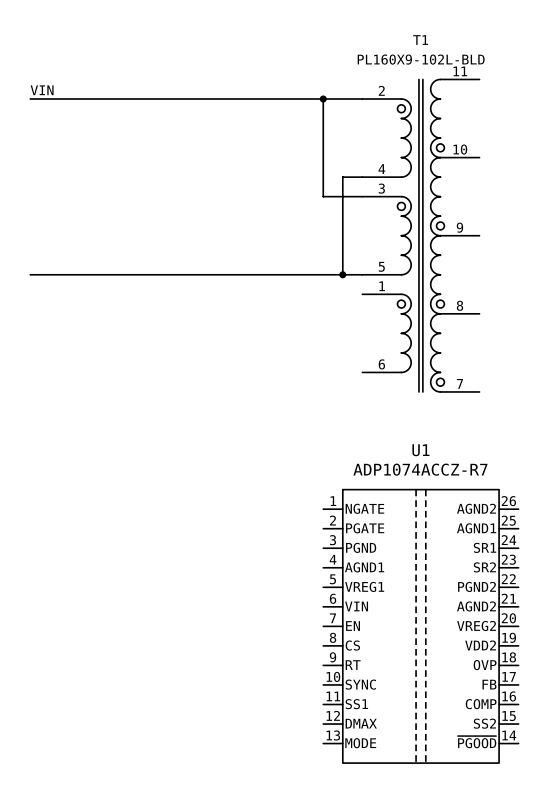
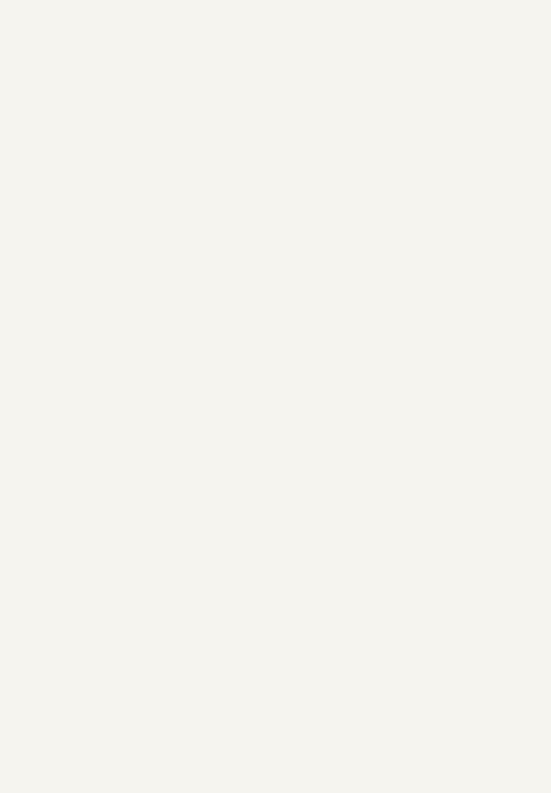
label: VIN (42, 90) -> none
wire: (30, 98) (362, 98) -> none
wire: (323, 98) (323, 196) (362, 196) -> none
junction: (323, 98) -> none
wire: (362, 177) (342, 177) (342, 274) -> none
T1: PL160X9-102L-BLD (420, 235) -> none
wire: (30, 274) (362, 274) -> none
junction: (342, 274) -> none
U1: ADP1074ACCZ-R7 (420, 626) -> none

